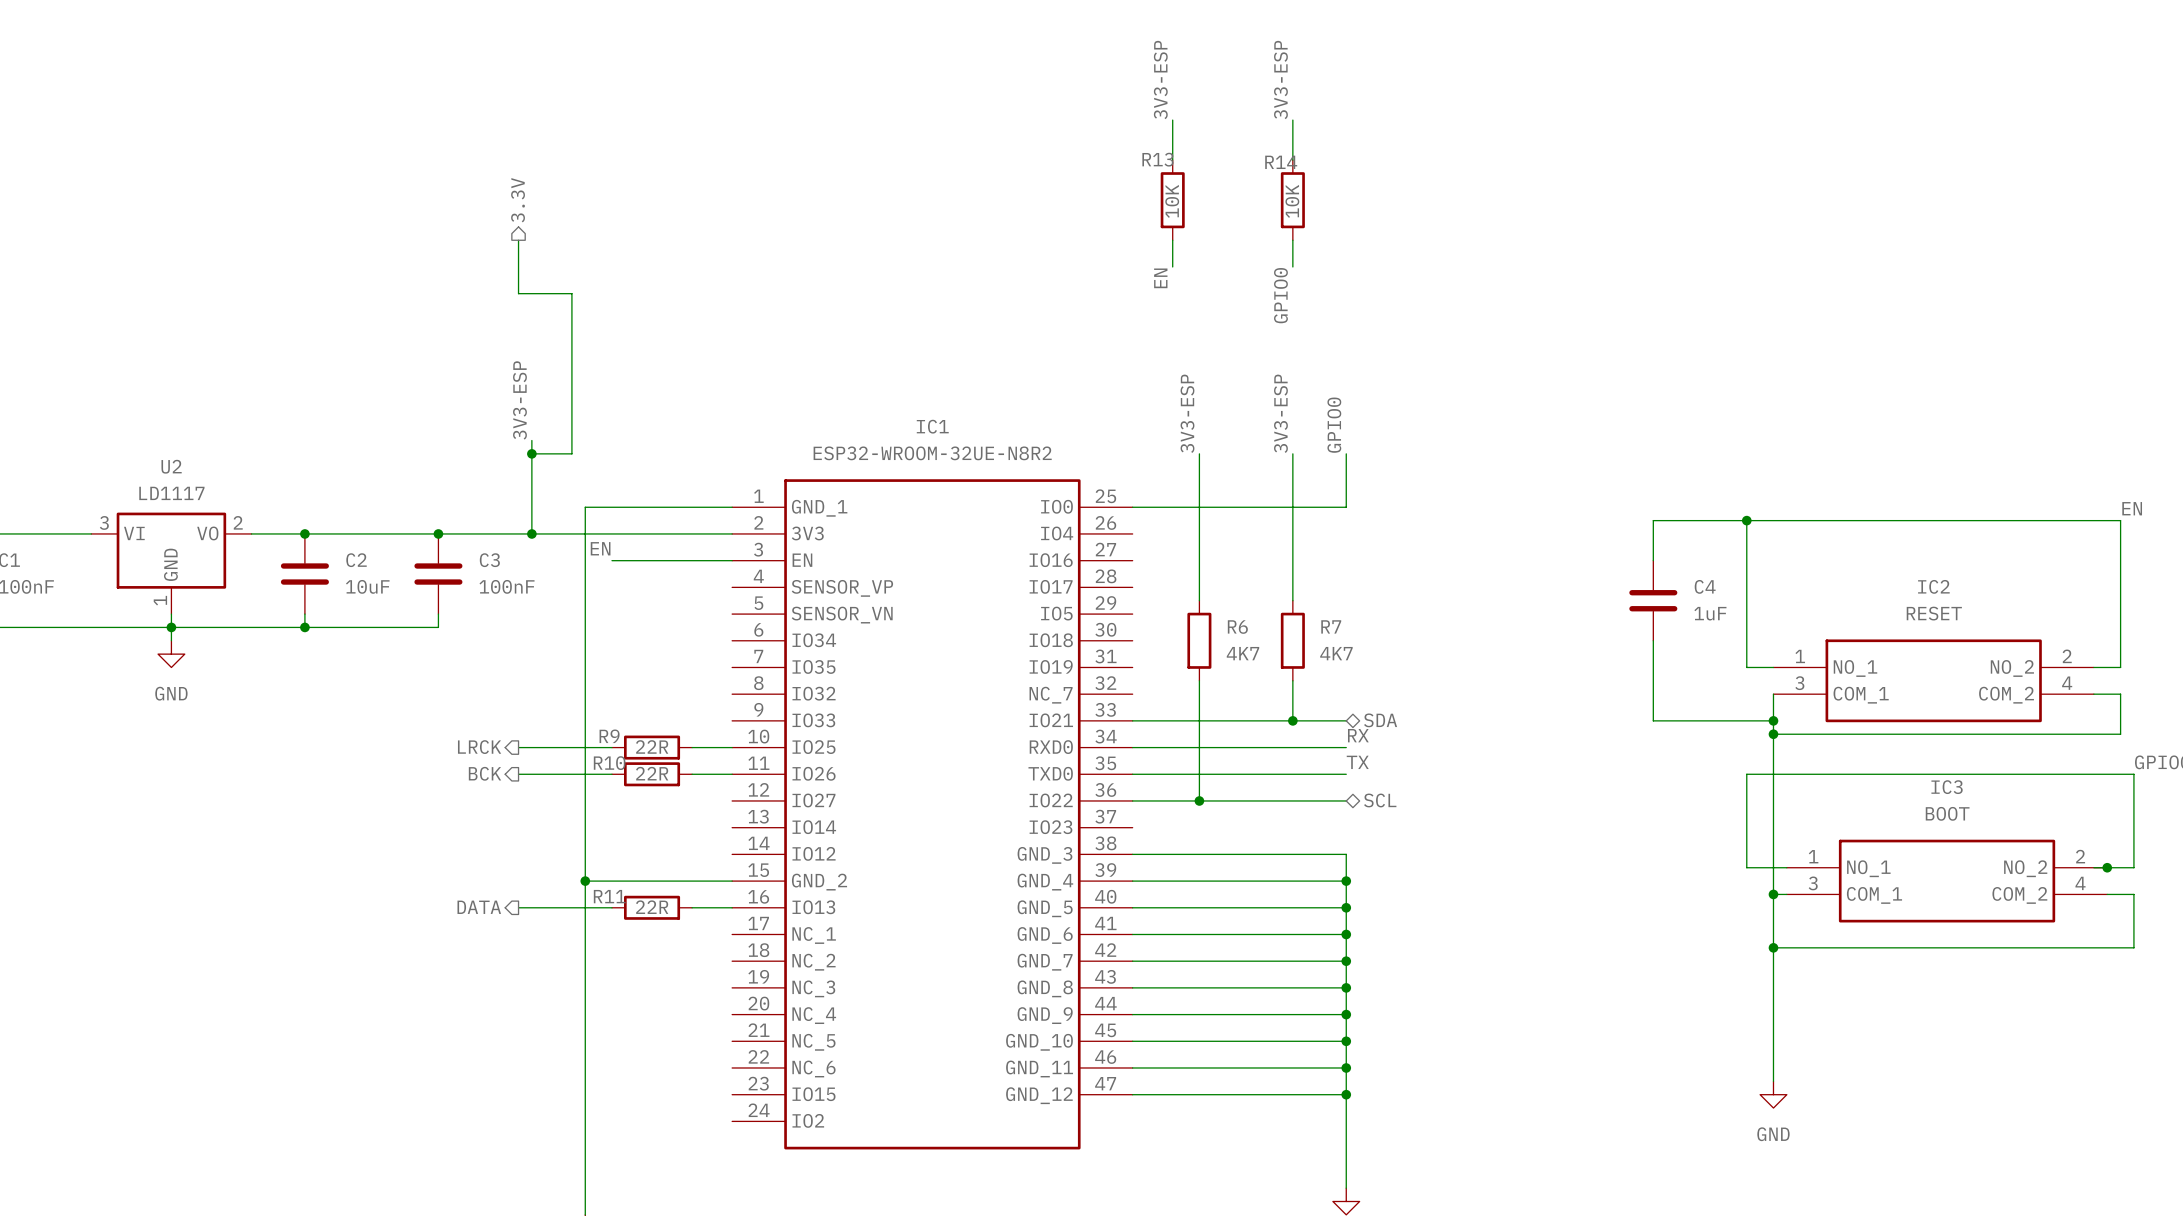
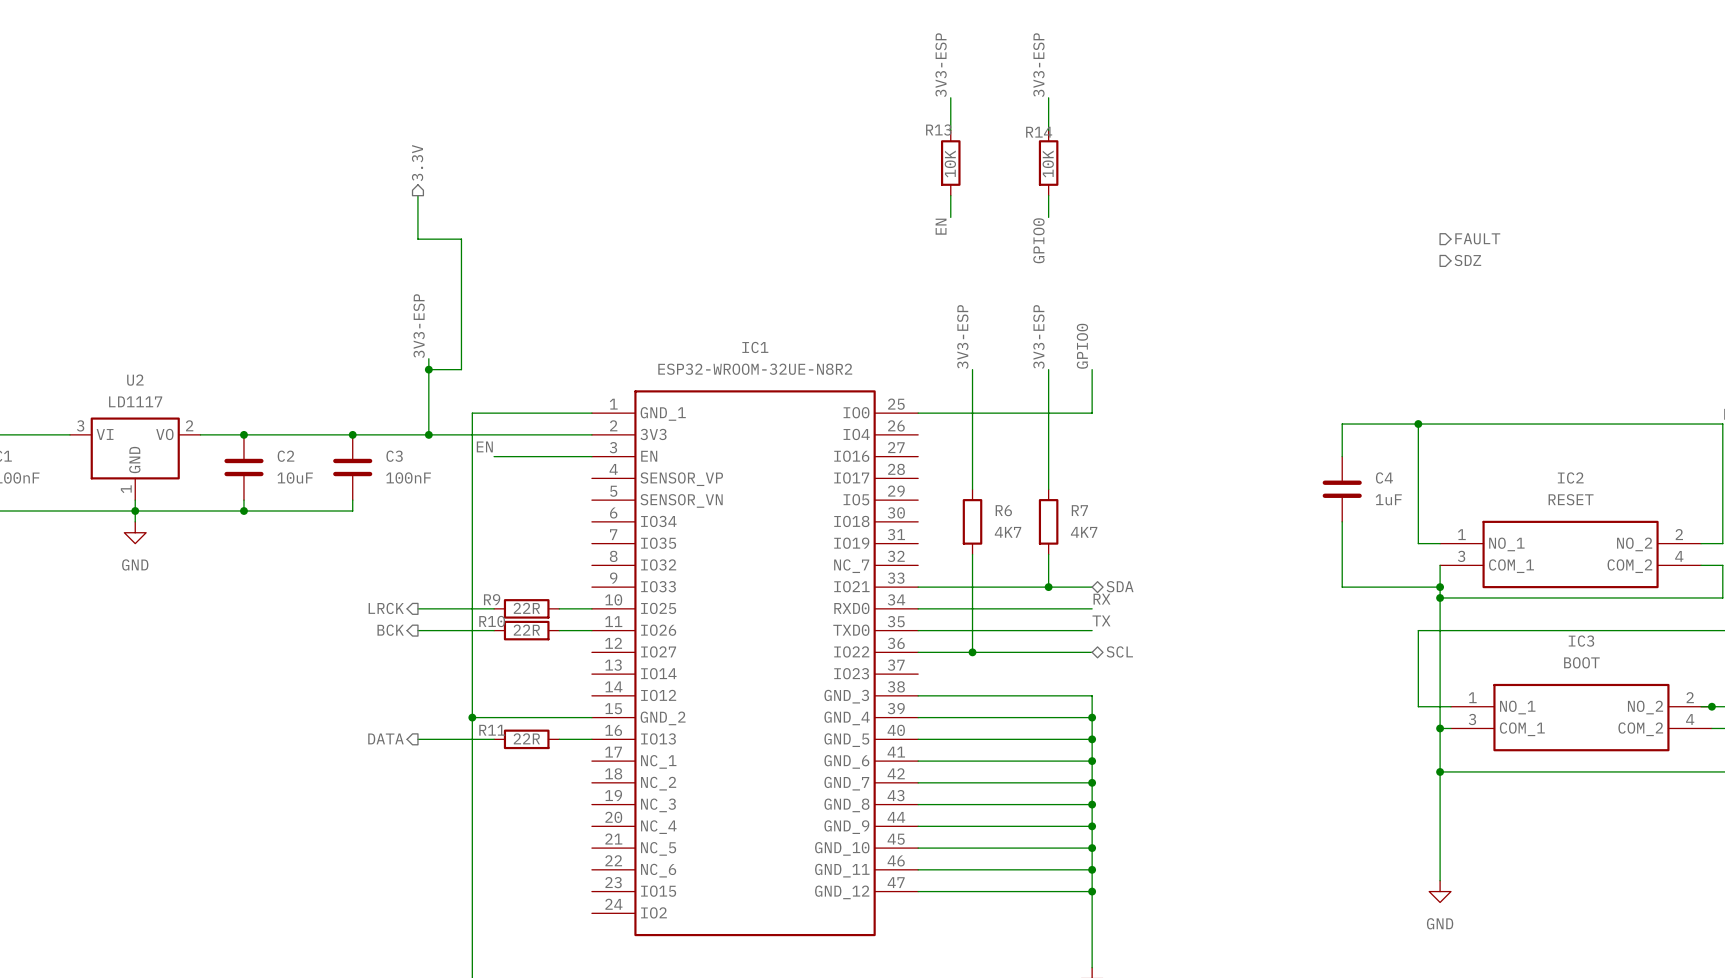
hierarchical label: none -> FAULT (1477, 238)
hierarchical label: none -> SDZ (1467, 260)

